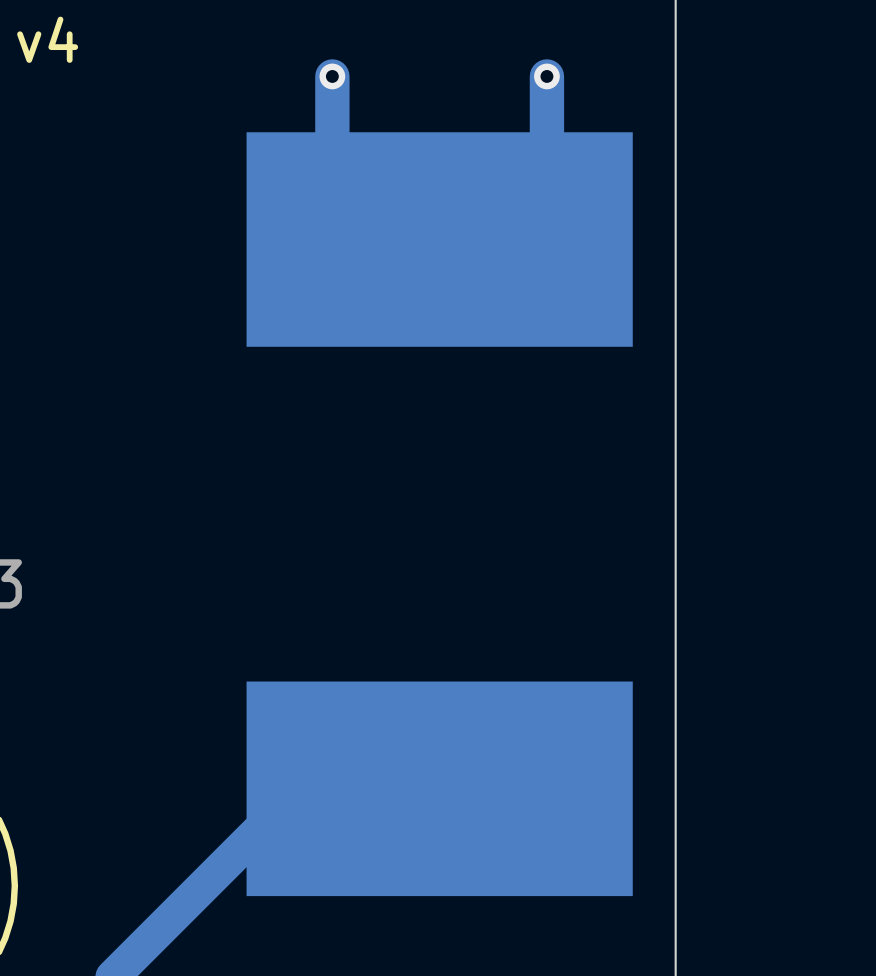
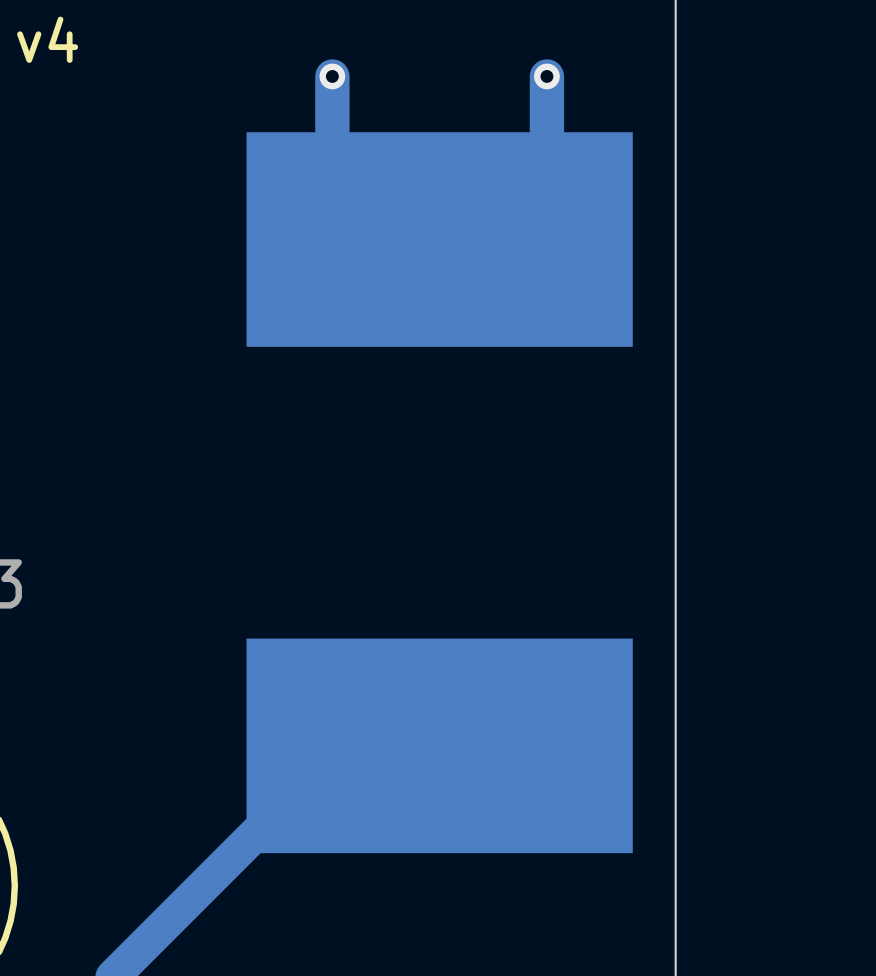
part position: (439, 788) -> (439, 745)

